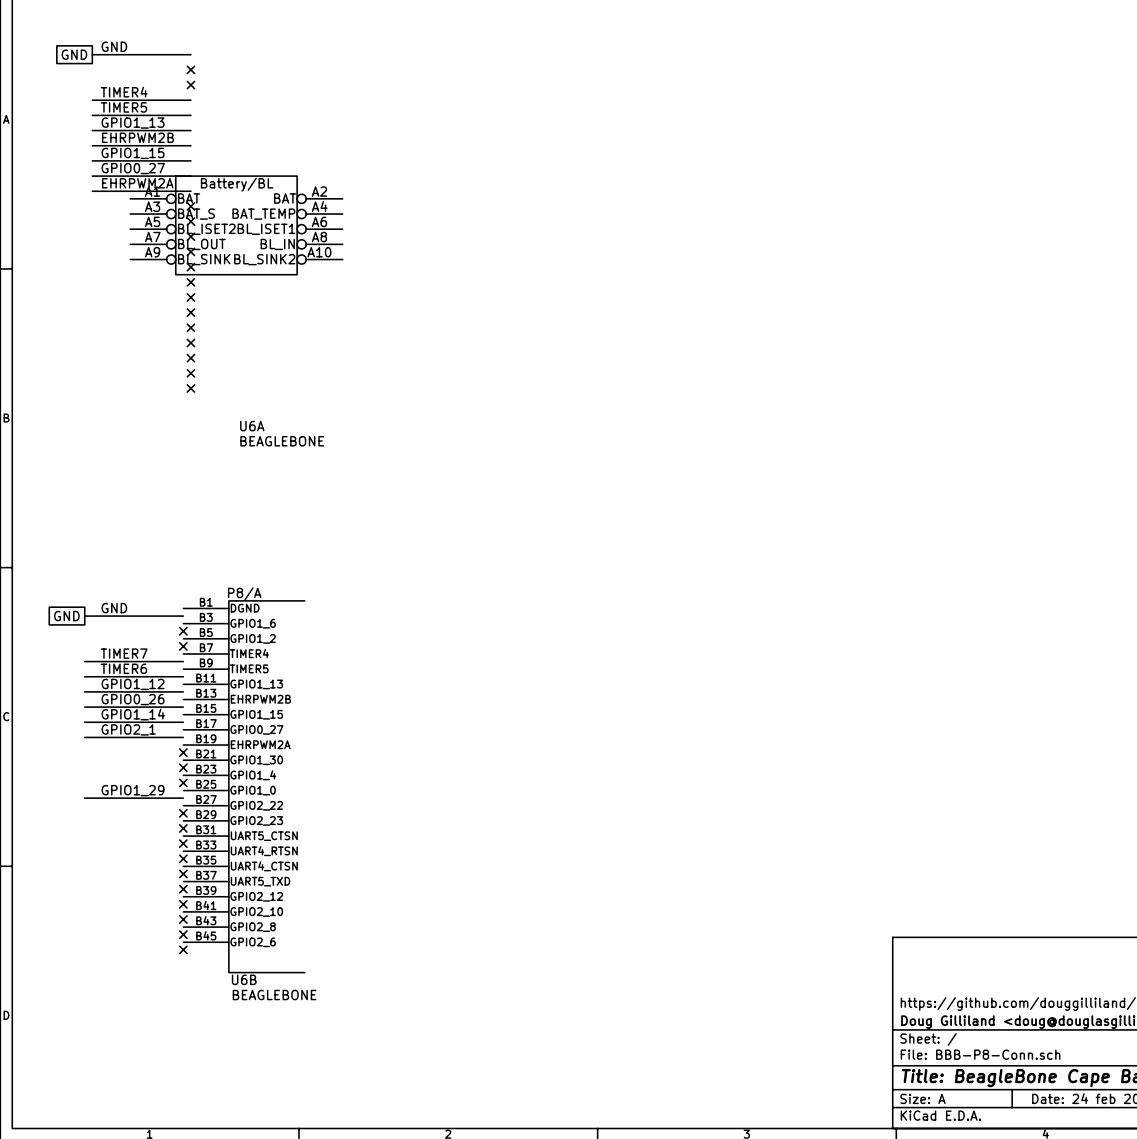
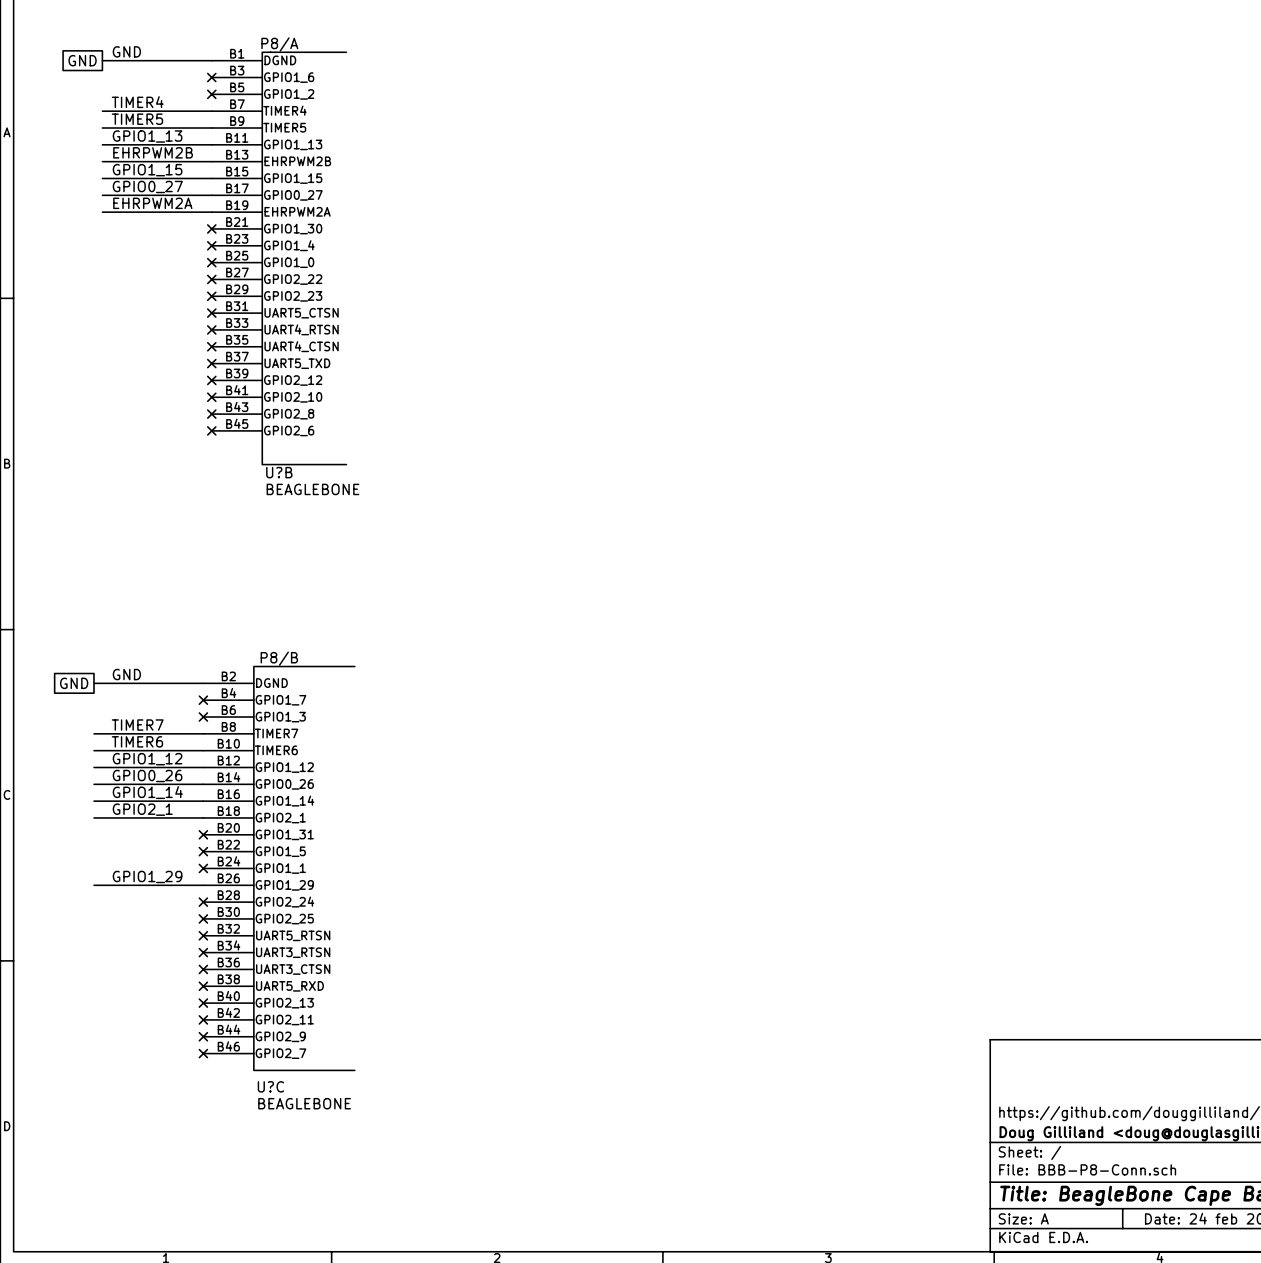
U6A: BEAGLEBONE (236, 225) -> none
U?B: none -> BEAGLEBONE (279, 258)
U?C: none -> BEAGLEBONE (279, 868)
U6B: BEAGLEBONE (244, 786) -> none

